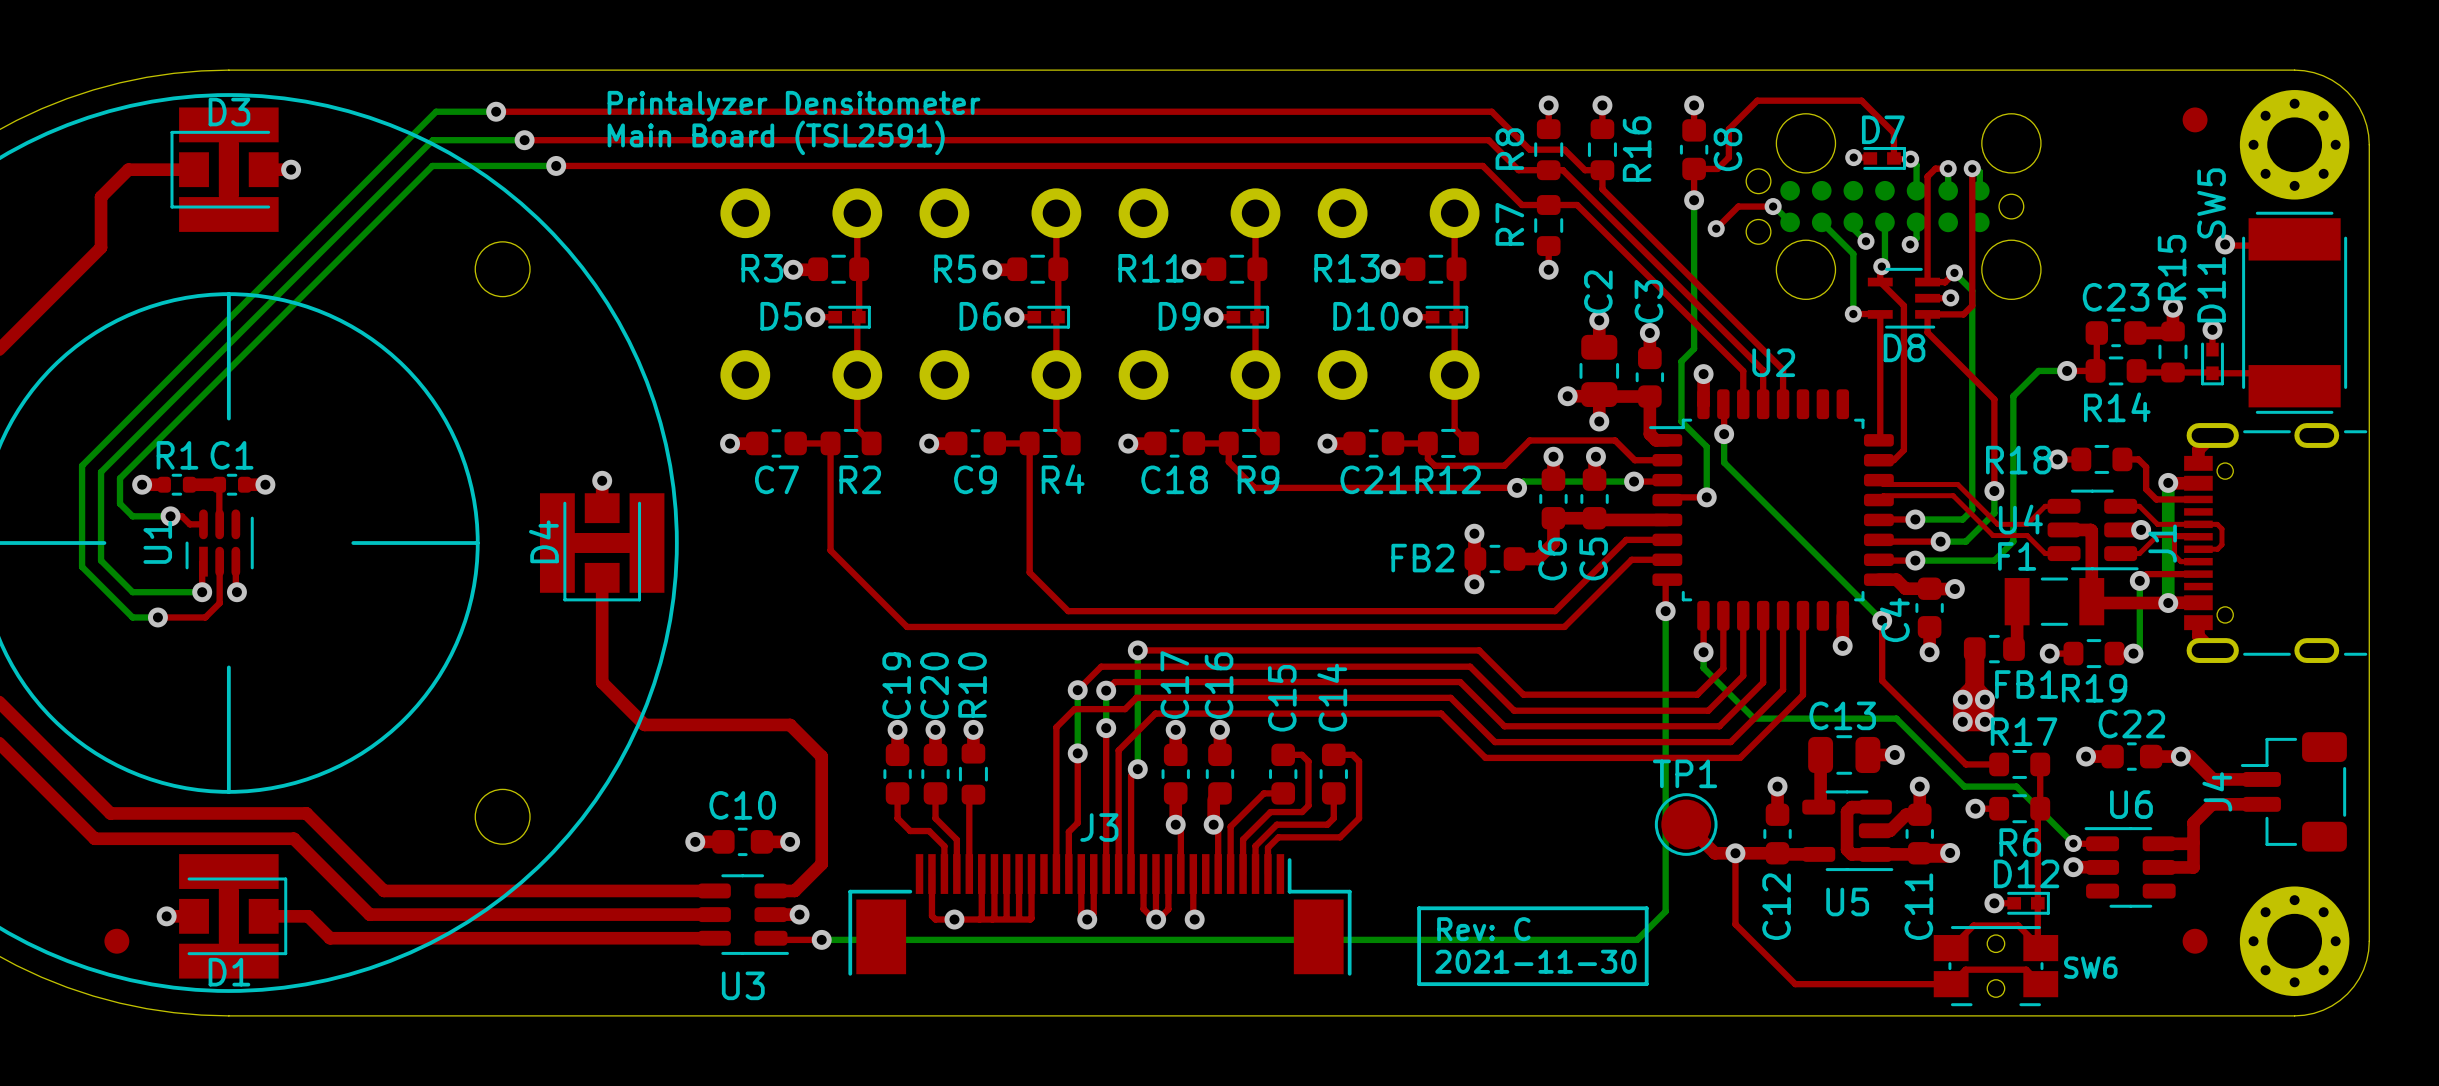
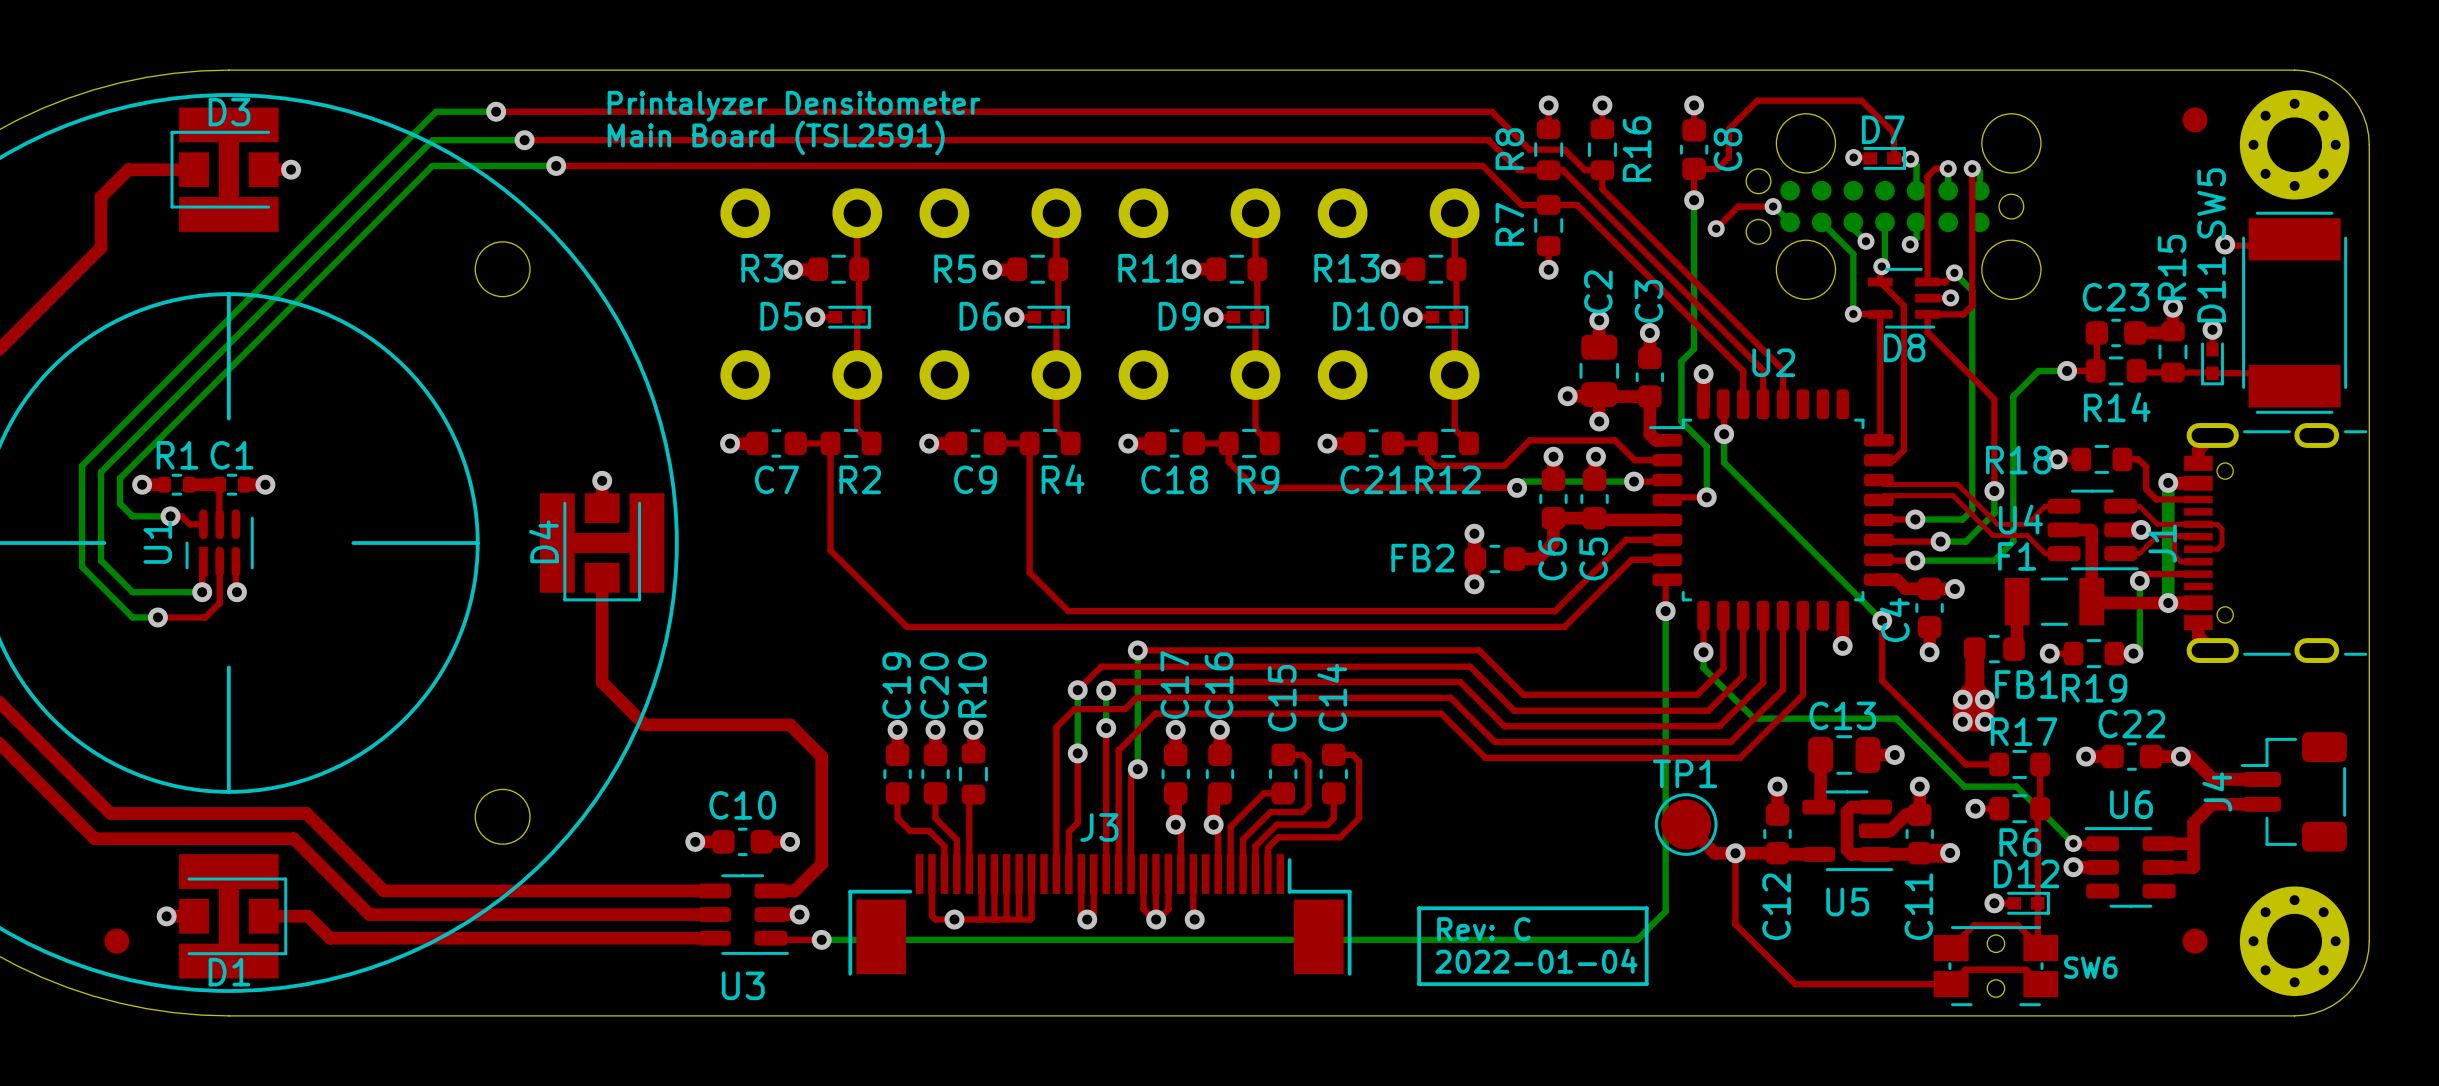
text: 2021-11-30 (1535, 961) -> 2022-01-04 (1536, 961)

